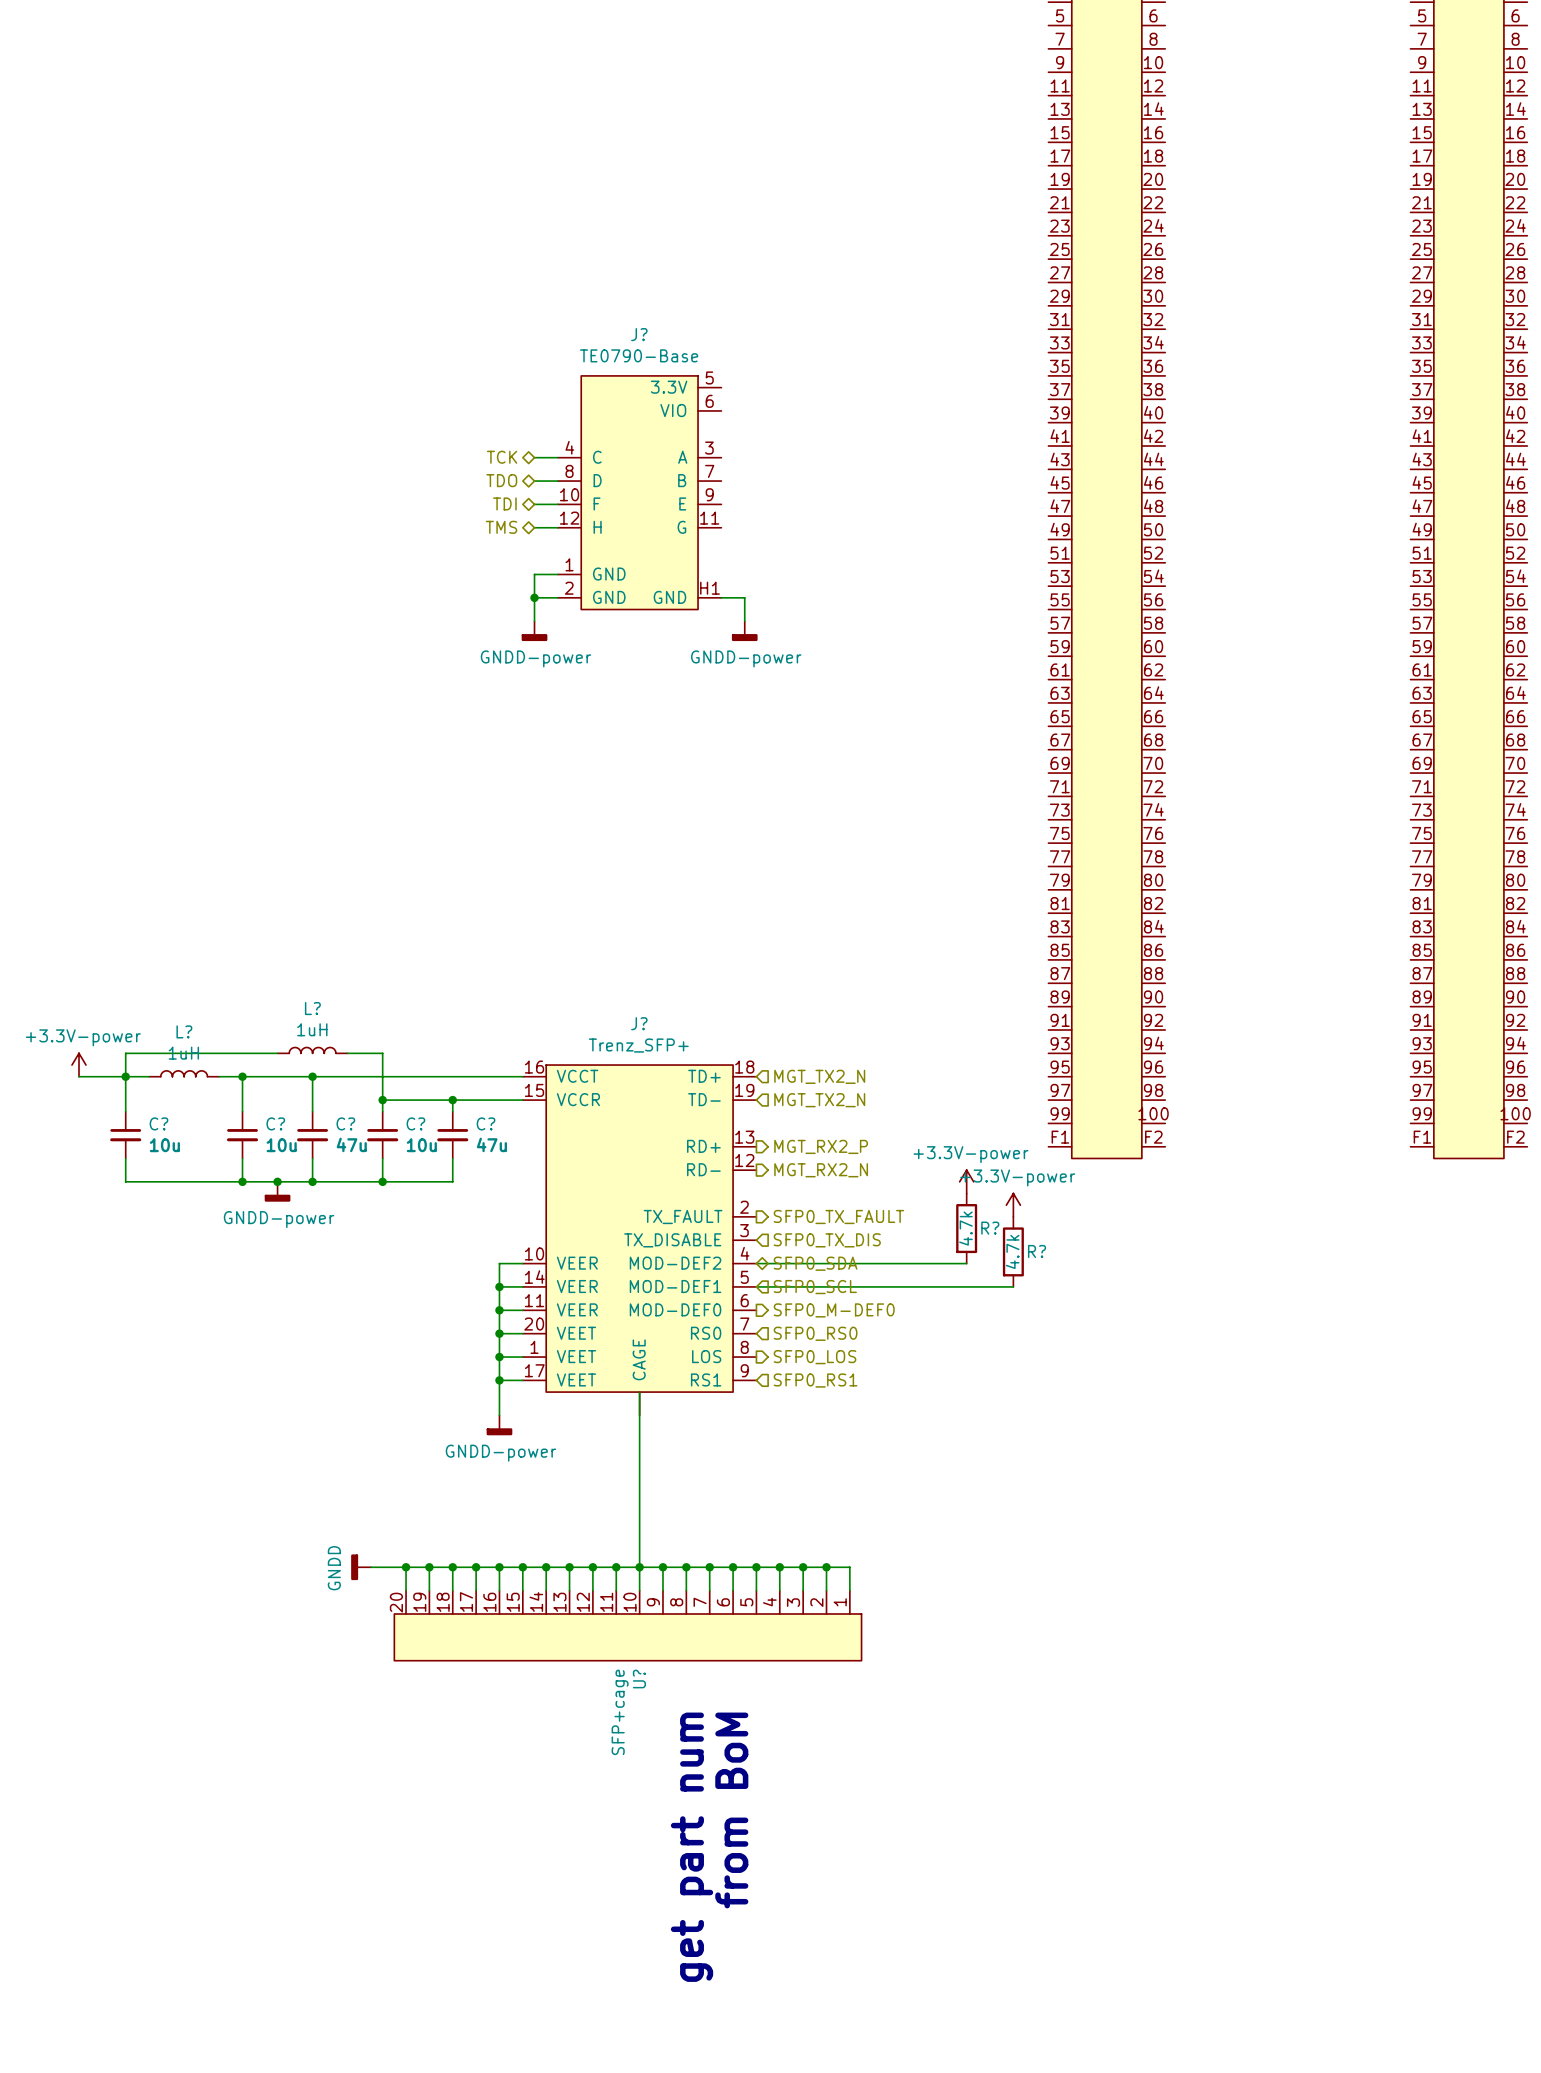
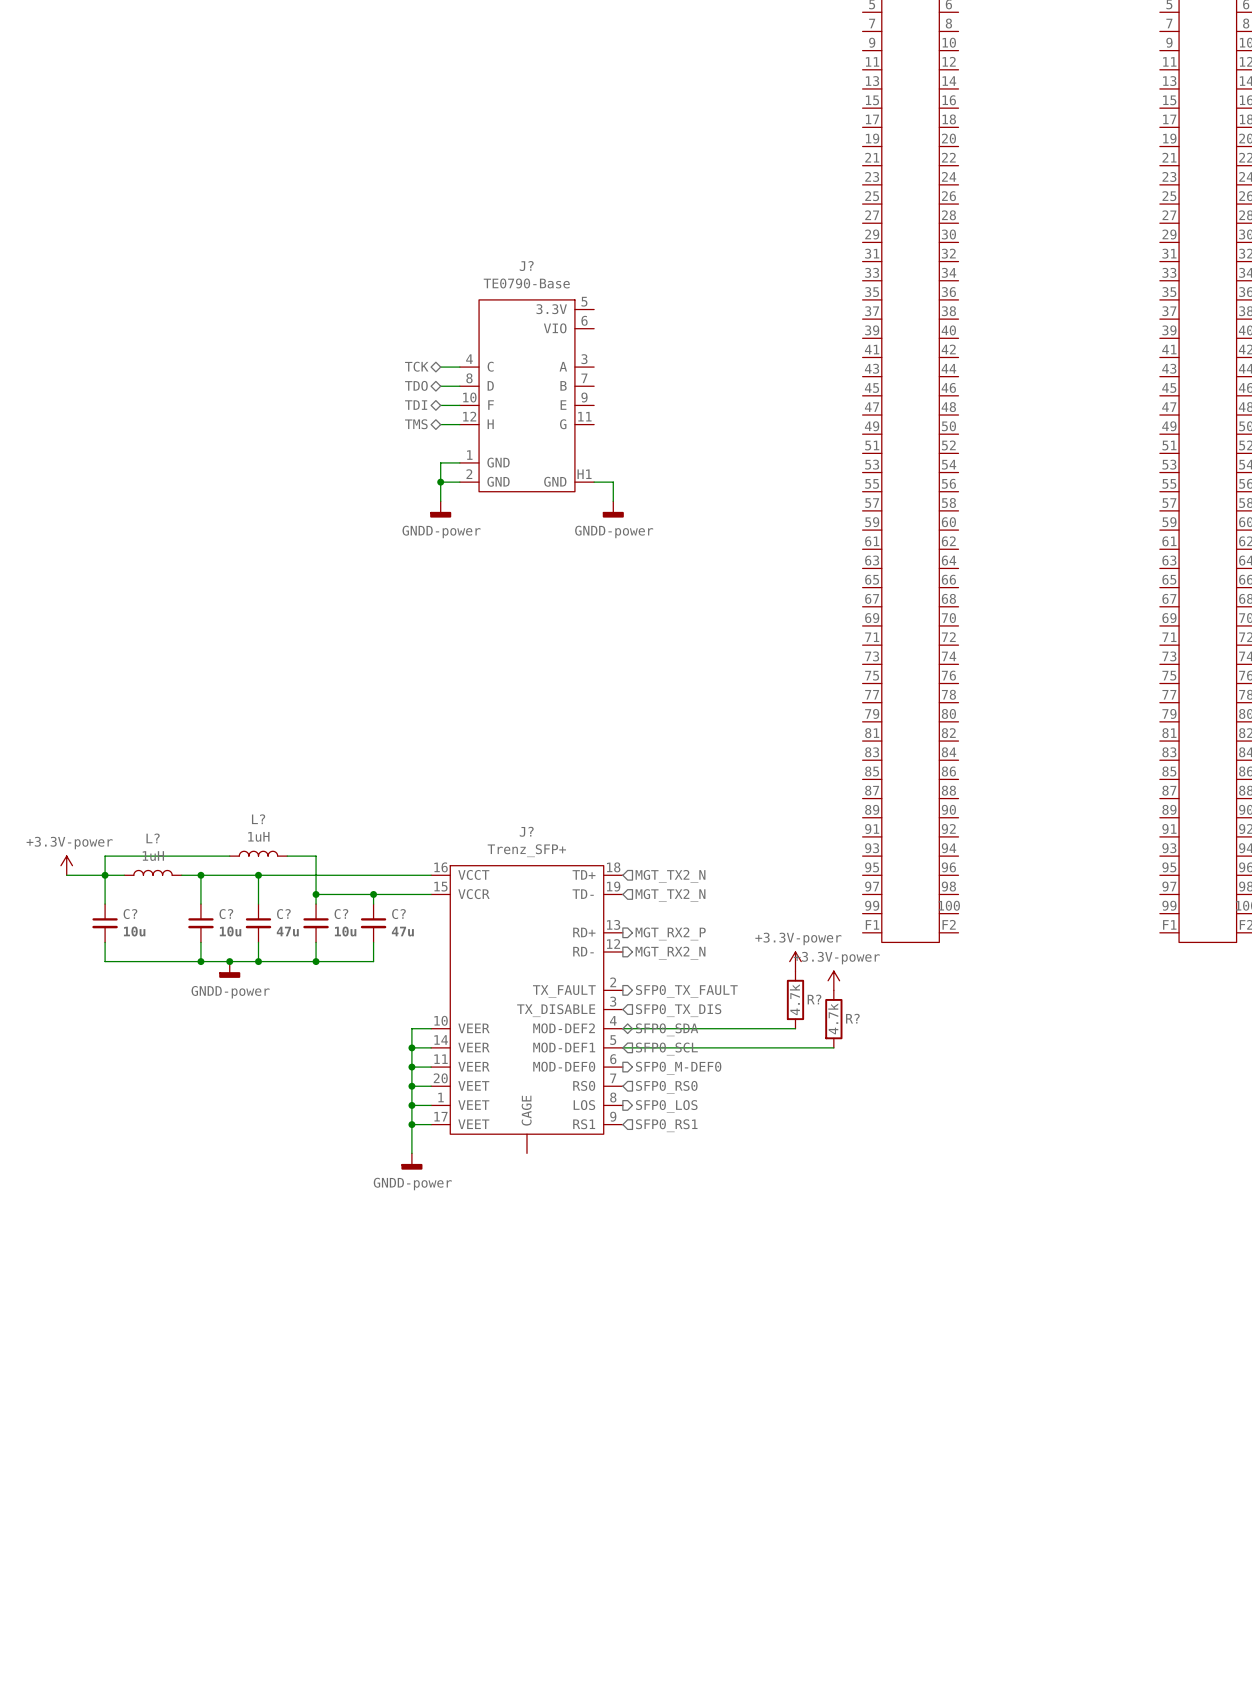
wire: (639, 1392) (639, 1590) -> none
power symbol: GNDD (361, 1567) -> none
wire: (370, 1567) (849, 1567) (849, 1590) -> none
wire: (406, 1567) (406, 1590) -> none
junction: (406, 1567) -> none
wire: (429, 1567) (429, 1590) -> none
junction: (429, 1567) -> none
wire: (452, 1567) (452, 1590) -> none
junction: (452, 1567) -> none
wire: (476, 1567) (476, 1590) -> none
junction: (476, 1567) -> none
wire: (499, 1567) (499, 1590) -> none
junction: (499, 1567) -> none
wire: (522, 1567) (522, 1590) -> none
junction: (522, 1567) -> none
wire: (546, 1567) (546, 1590) -> none
junction: (546, 1567) -> none
wire: (569, 1567) (569, 1590) -> none
junction: (569, 1567) -> none
wire: (592, 1567) (592, 1590) -> none
junction: (592, 1567) -> none
wire: (616, 1567) (616, 1590) -> none
junction: (616, 1567) -> none
junction: (639, 1567) -> none
wire: (662, 1567) (662, 1590) -> none
junction: (662, 1567) -> none
wire: (686, 1567) (686, 1590) -> none
junction: (686, 1567) -> none
wire: (709, 1567) (709, 1590) -> none
junction: (709, 1567) -> none
wire: (733, 1567) (733, 1590) -> none
junction: (733, 1567) -> none
wire: (756, 1567) (756, 1590) -> none
junction: (756, 1567) -> none
wire: (779, 1567) (779, 1590) -> none
junction: (779, 1567) -> none
wire: (803, 1567) (803, 1590) -> none
junction: (803, 1567) -> none
wire: (826, 1567) (826, 1590) -> none
junction: (826, 1567) -> none
U?: SFP+cage (627, 1625) -> none
text: from BoM (731, 1810) -> none
text: get part num (692, 1847) -> none

